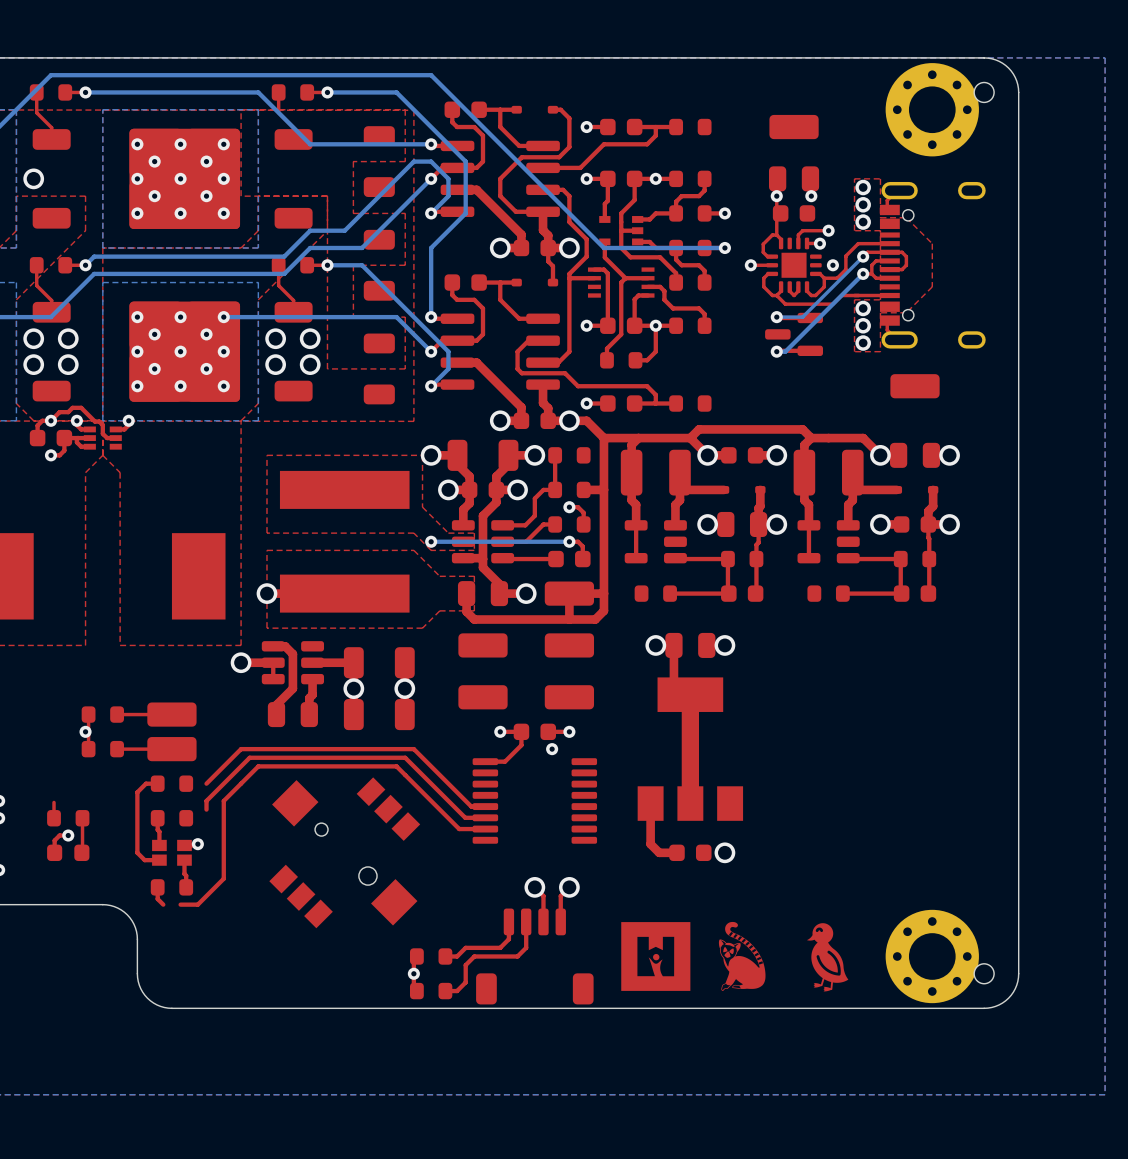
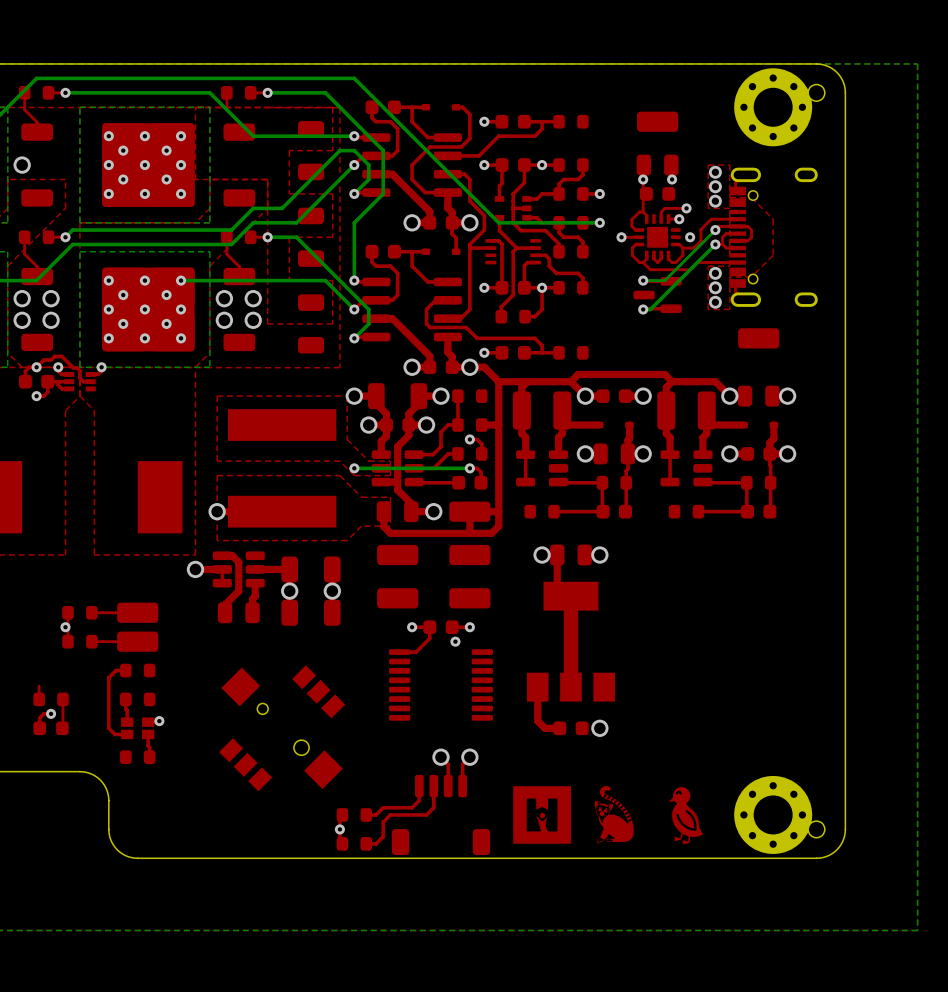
top track: (206, 783) (241, 749) (413, 749) (471, 806) (485, 806) -> none
top track: (206, 809) (206, 800) (249, 757) (405, 757) (465, 817) (485, 817) -> none
top track: (485, 829) (459, 829) (396, 766) (258, 766) (223, 800) (223, 878) (197, 904) (180, 904) -> none
top track: (157, 887) (157, 899) (163, 904) -> none

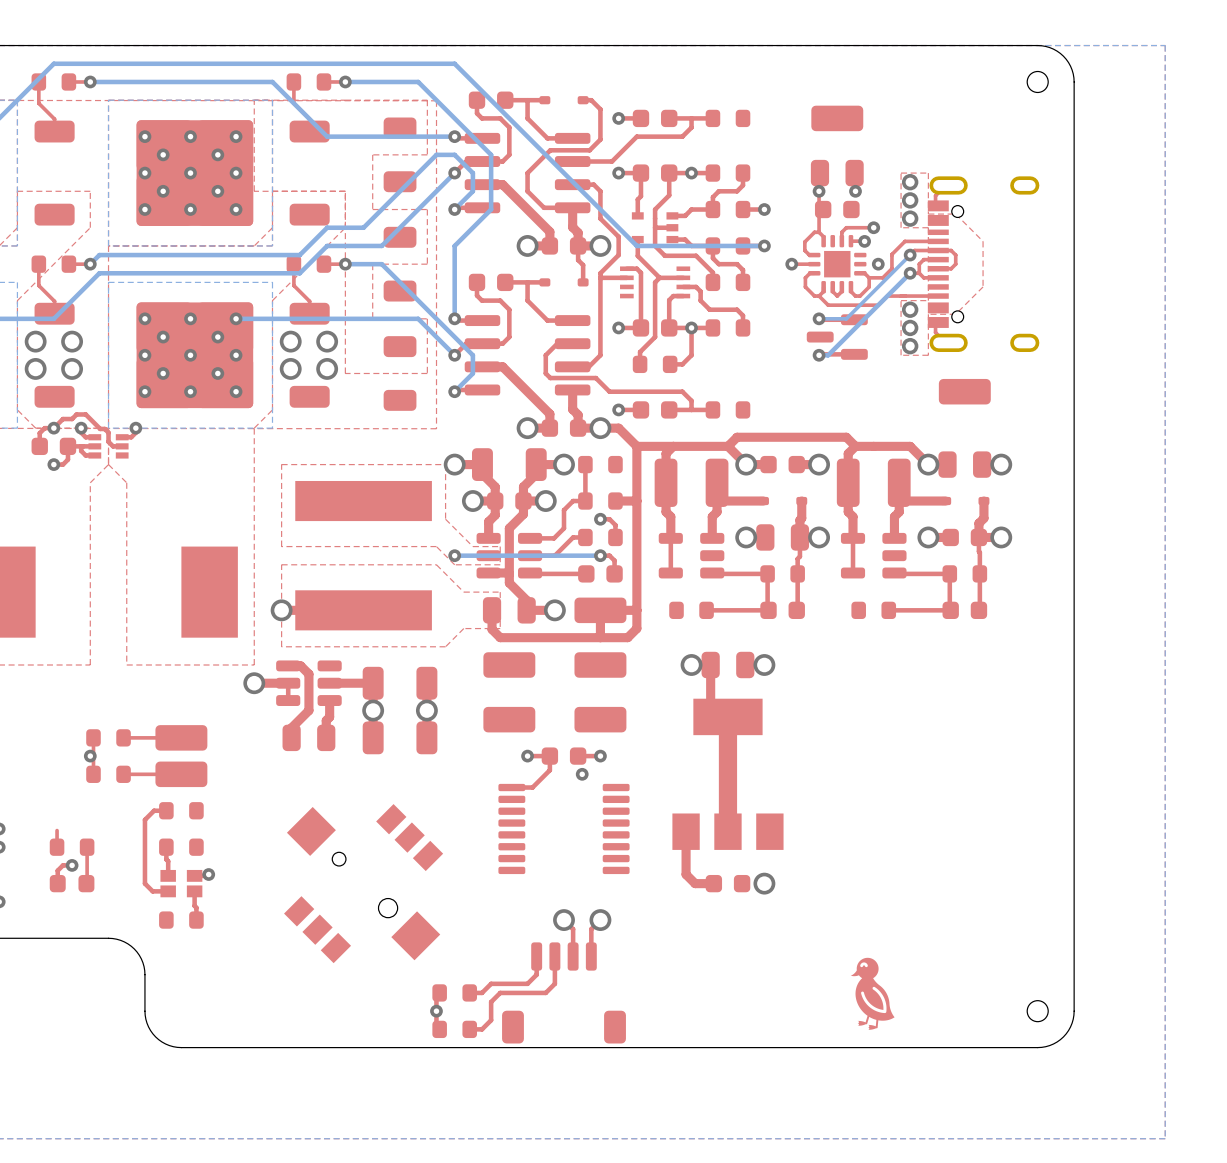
part: (773, 107) -> none
via: (22, 165) -> none
part: (542, 814) -> none
part: (614, 814) -> none
part: (773, 814) -> none

